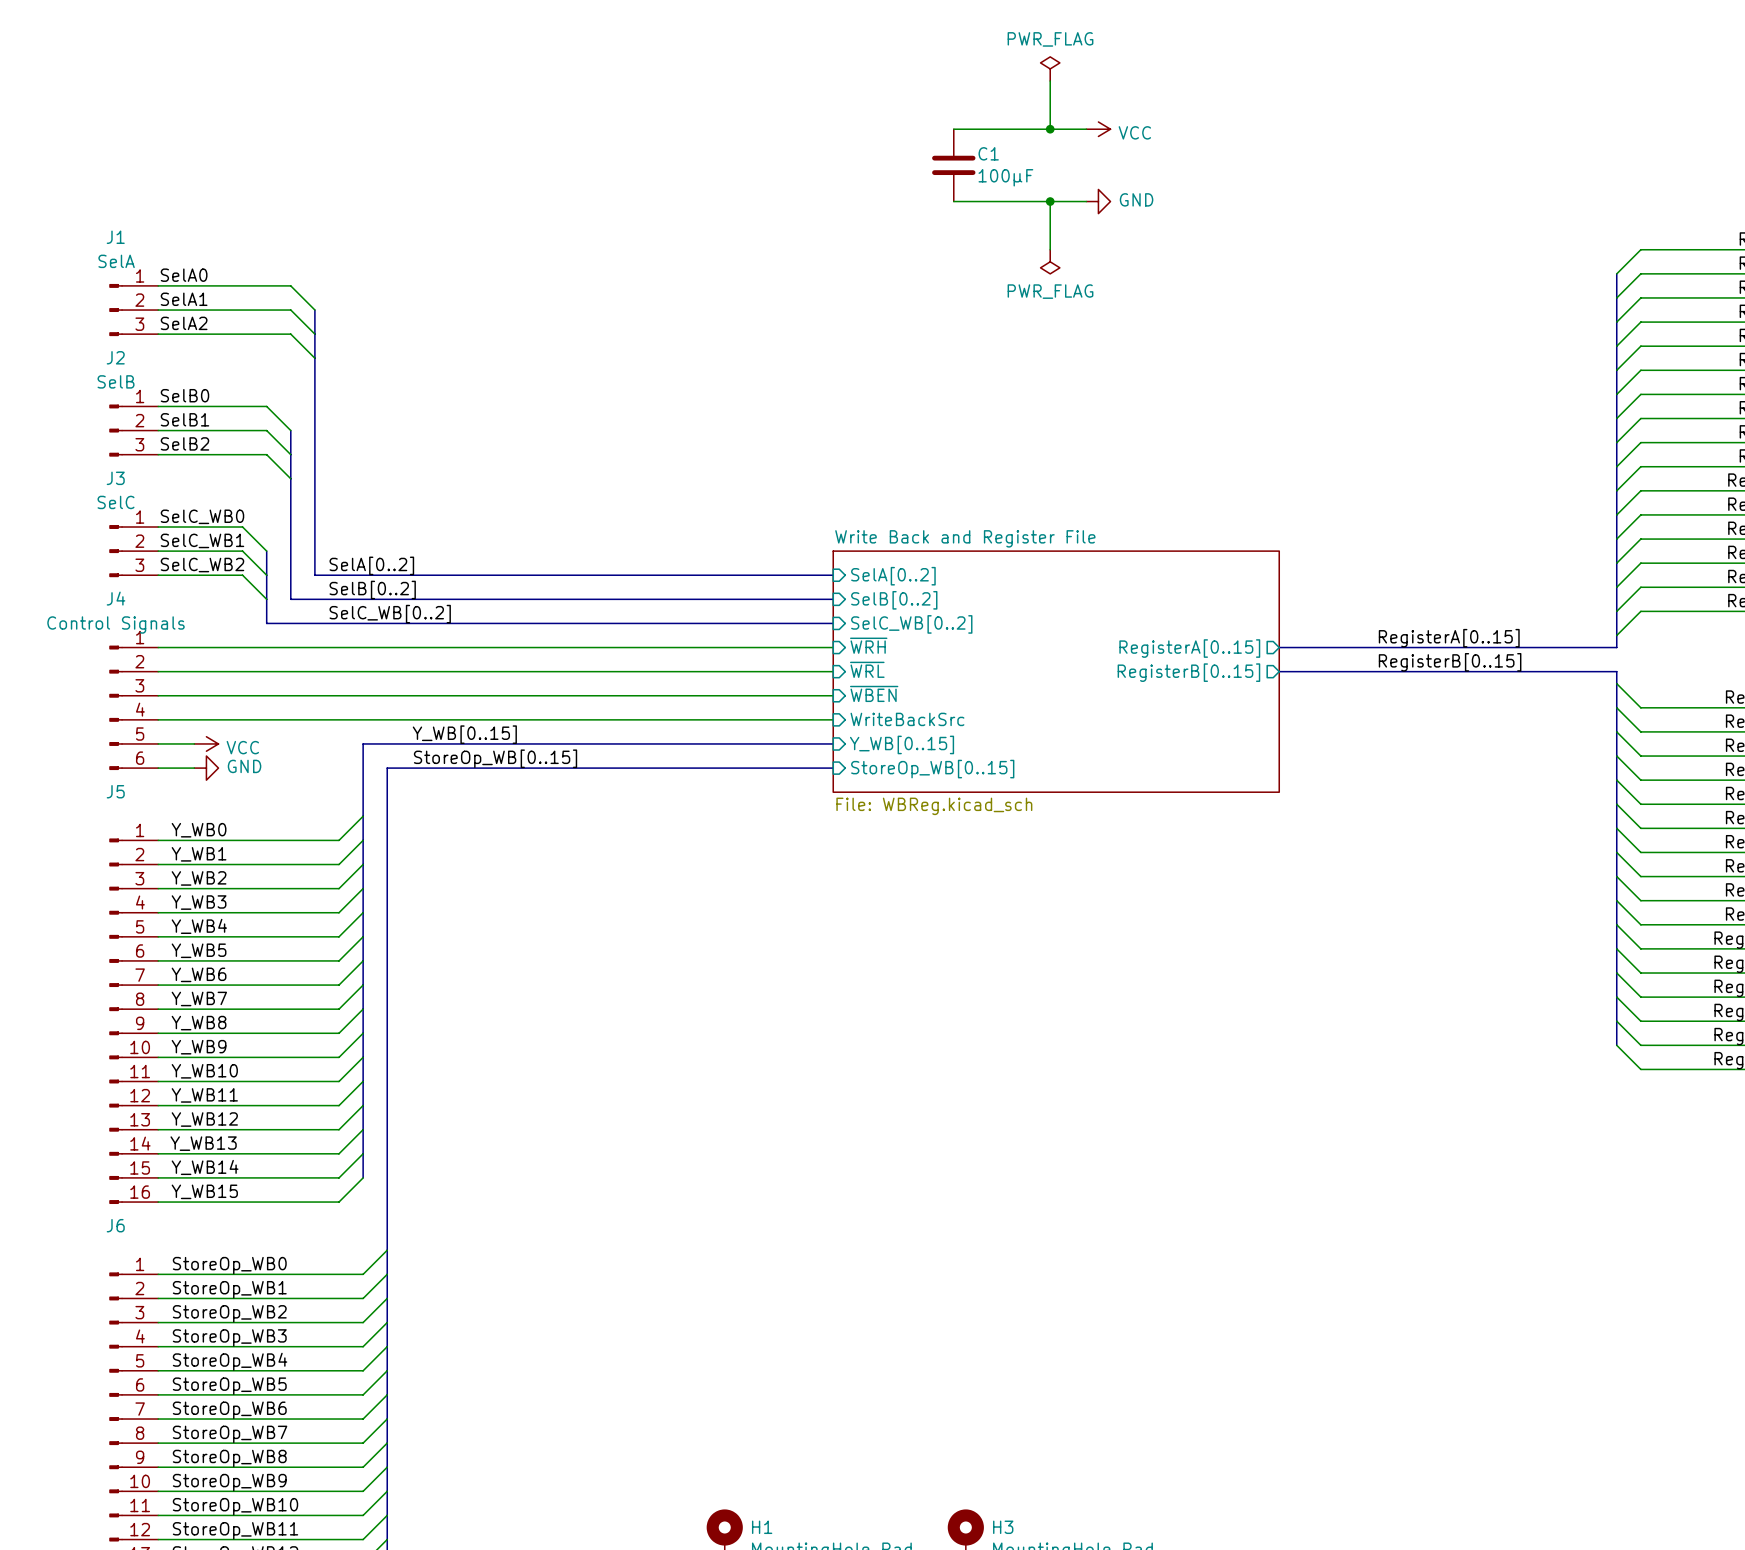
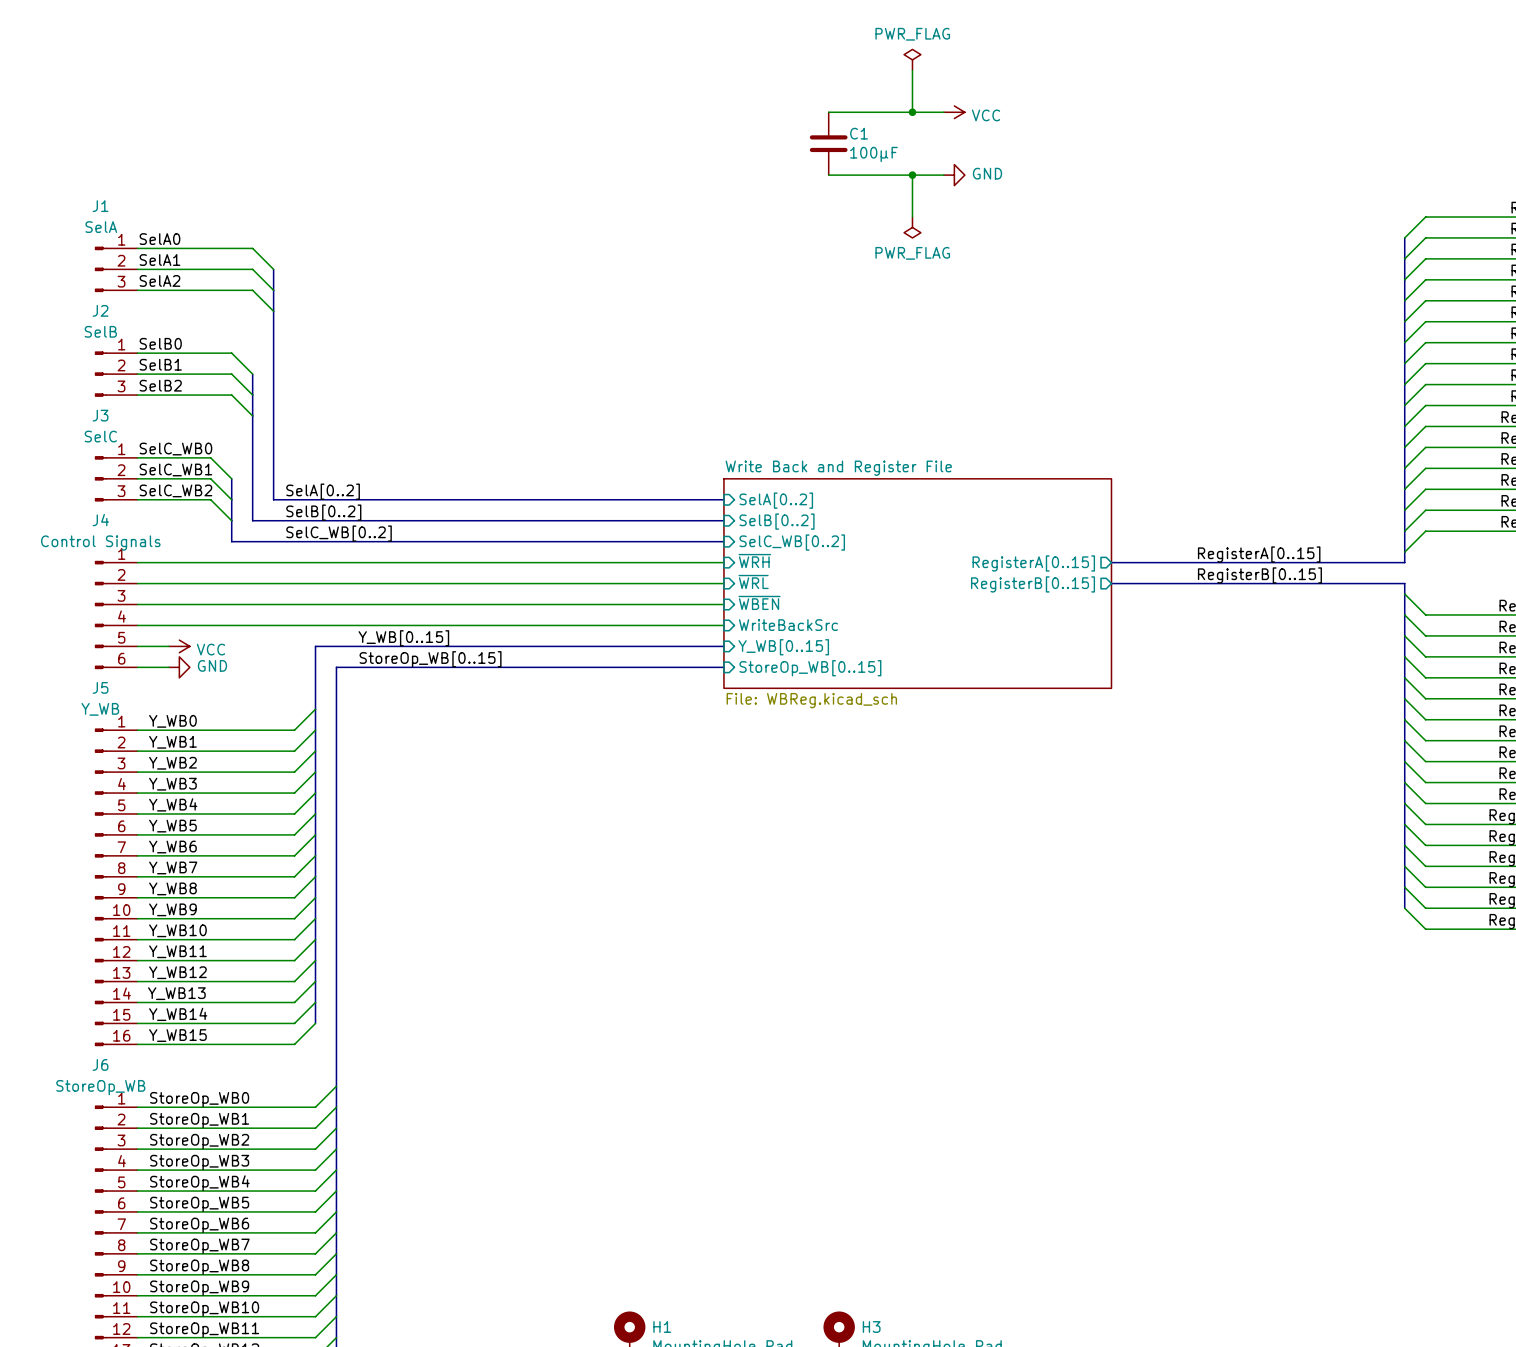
J5 value: none -> Y_WB (100, 709)
J6 value: none -> StoreOp_WB (100, 1087)

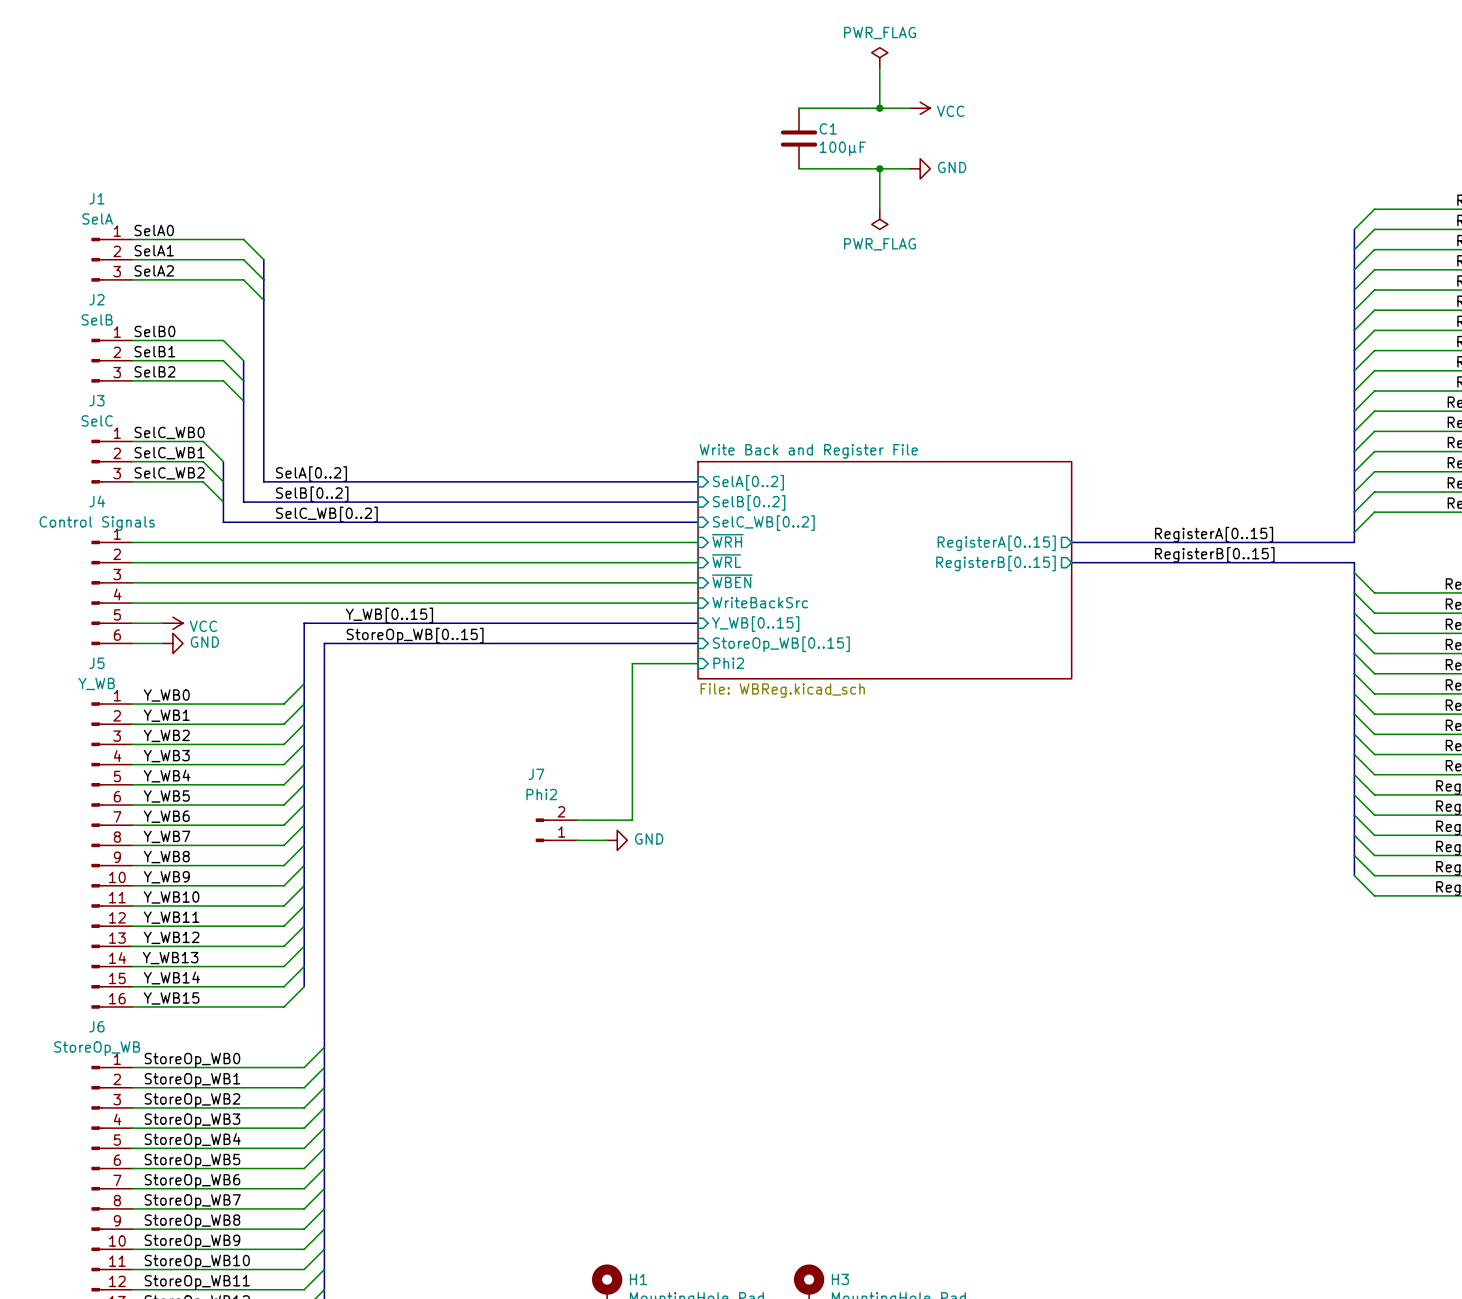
sheet Write Back and Register File shape: [723, 478, 1113, 689] -> [697, 461, 1073, 680]
sheet pin: none -> Phi2 (728, 663)
wire: none -> (698, 663) (632, 663) (632, 820) (576, 820)
J7: none -> Phi2 (556, 830)
wire: none -> (576, 840) (607, 840)
power symbol: none -> GND (617, 840)

